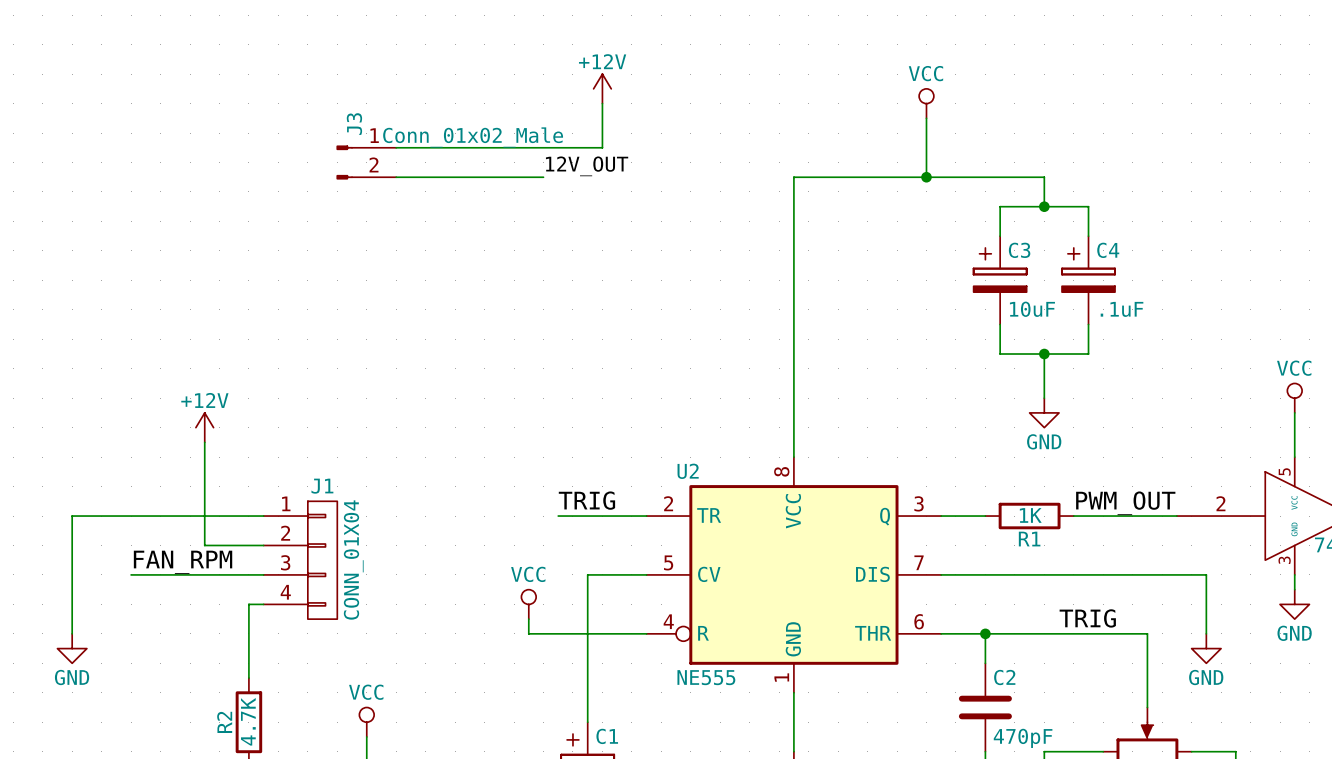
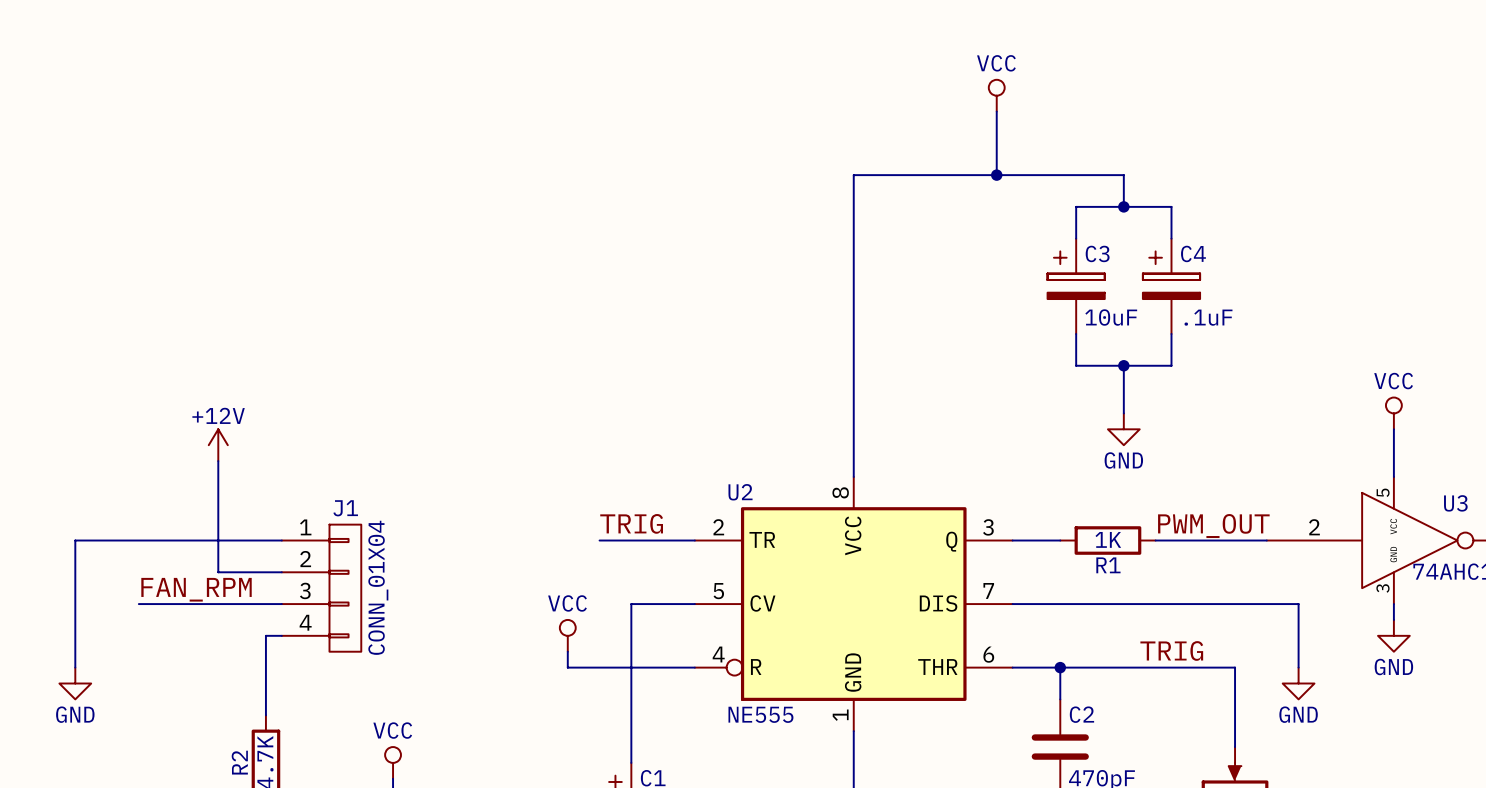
power symbol: +12V (602, 88) -> none
wire: (602, 103) (602, 147) (396, 147) -> none
J3: Conn_01x02_Male (366, 162) -> none
label: 12V_OUT (587, 166) -> none
wire: (396, 177) (543, 177) -> none

